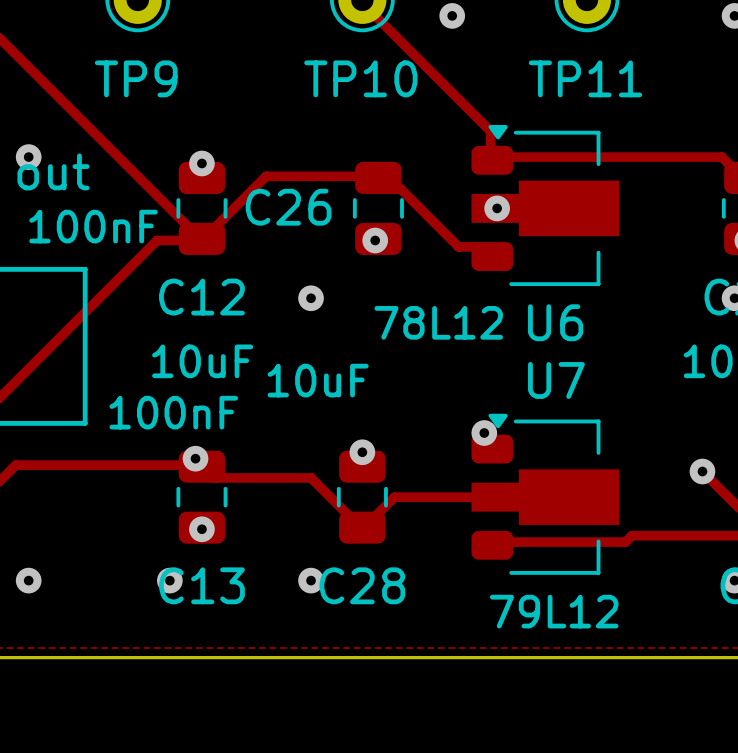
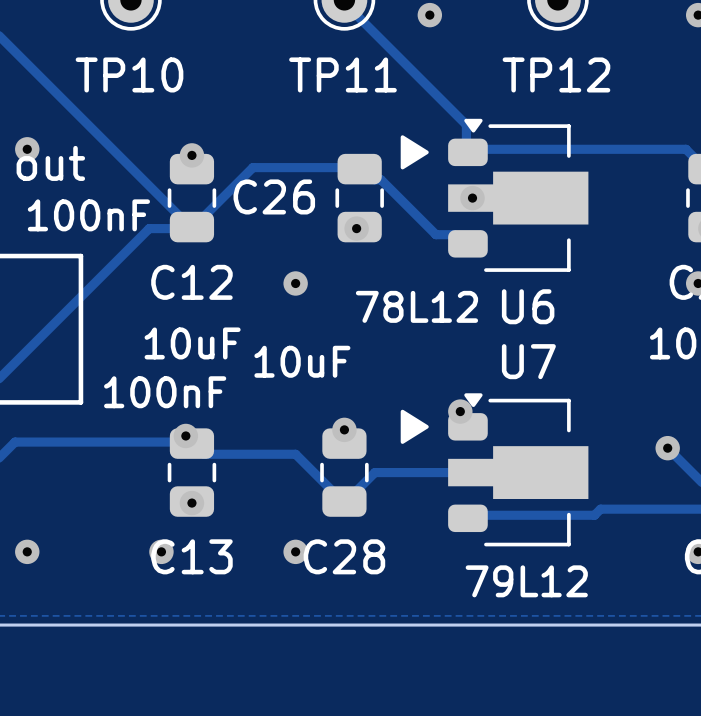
TP9 name: TP9 (136, 78) -> TP10 (129, 74)
TP10 name: TP10 (360, 78) -> TP11 (342, 74)
TP11 name: TP11 (585, 78) -> TP12 (556, 74)
drawing: none -> [400, 135, 429, 170]
drawing: none -> [400, 409, 429, 444]

